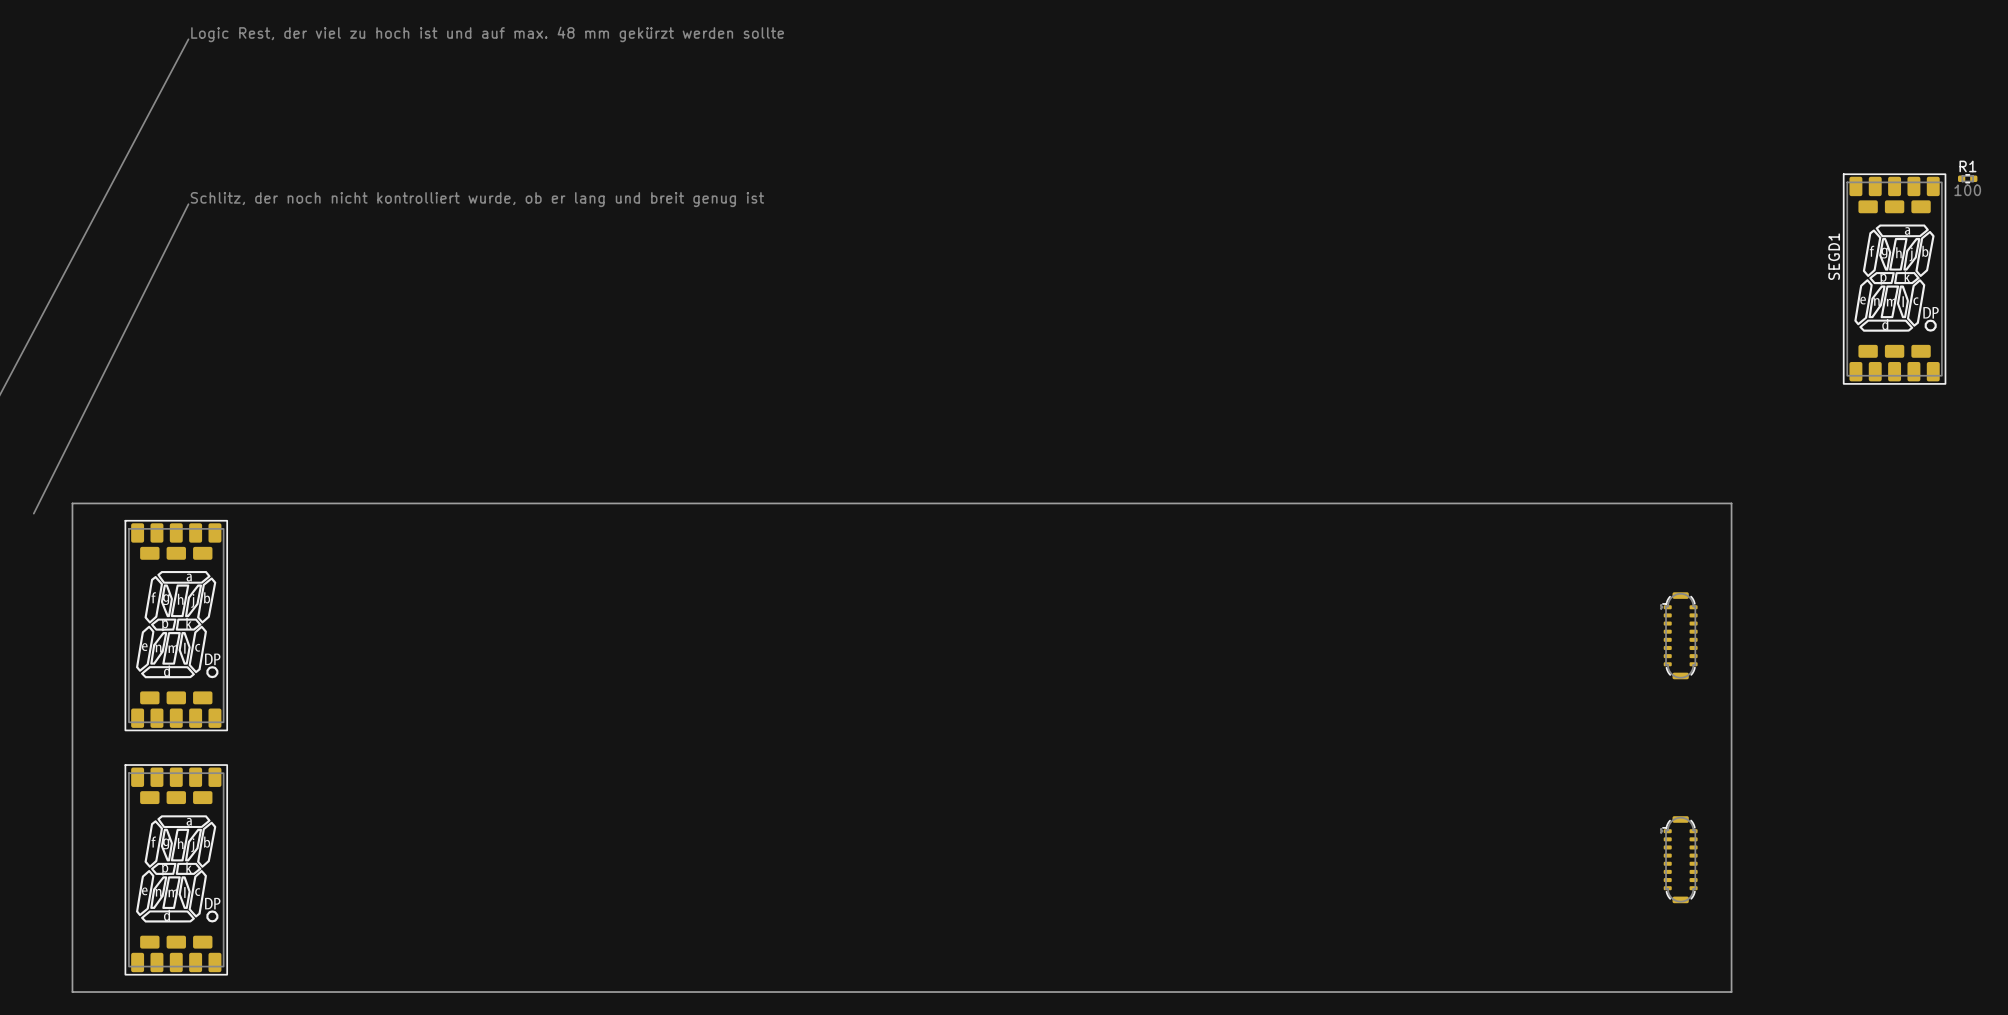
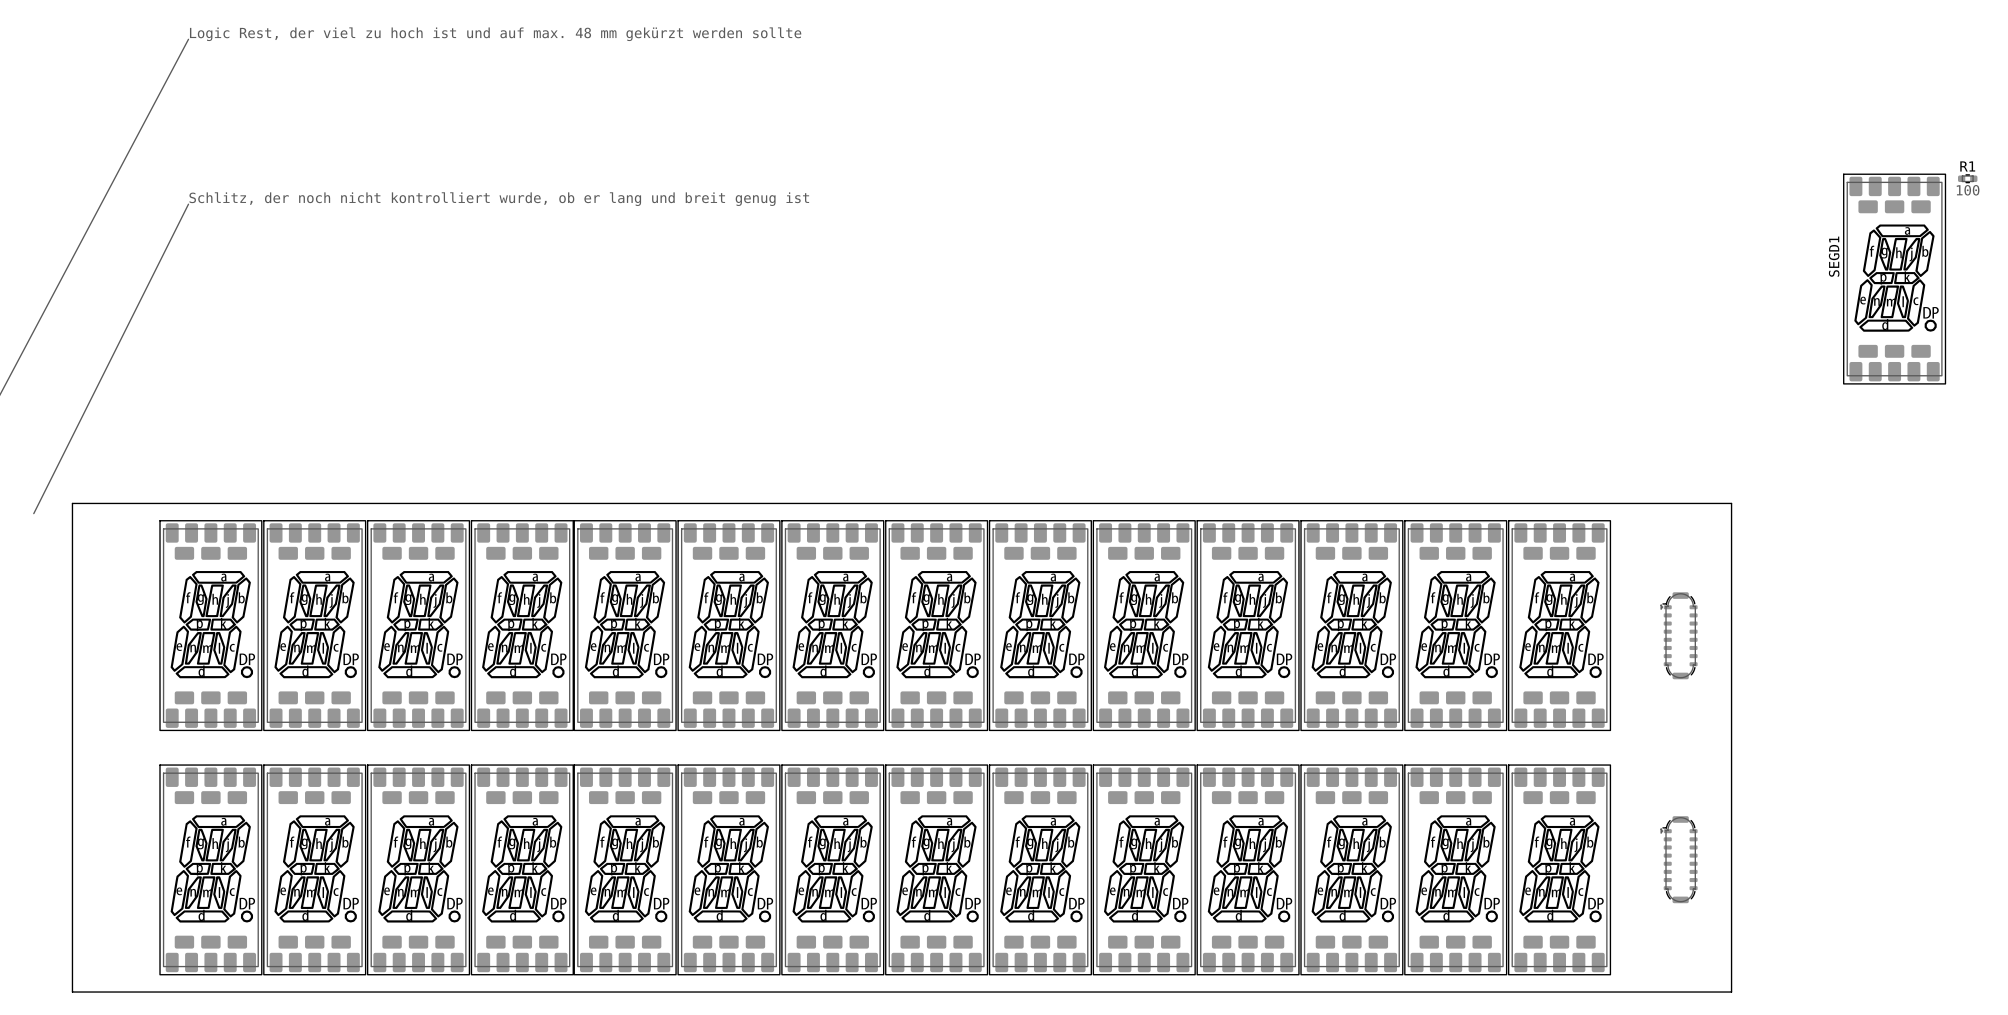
part position: (176, 625) -> (210, 625)
part: none -> (314, 625)
part: none -> (418, 625)
part: none -> (522, 625)
part: none -> (625, 625)
part: none -> (728, 625)
part: none -> (832, 625)
part: none -> (936, 625)
part: none -> (1040, 625)
part: none -> (1144, 625)
part: none -> (1248, 625)
part: none -> (1351, 625)
part: none -> (1455, 625)
part: none -> (1559, 625)
part position: (176, 869) -> (210, 869)
part: none -> (314, 869)
part: none -> (418, 869)
part: none -> (522, 869)
part: none -> (625, 869)
part: none -> (728, 869)
part: none -> (832, 869)
part: none -> (936, 869)
part: none -> (1040, 869)
part: none -> (1144, 869)
part: none -> (1248, 869)
part: none -> (1351, 869)
part: none -> (1455, 869)
part: none -> (1559, 869)

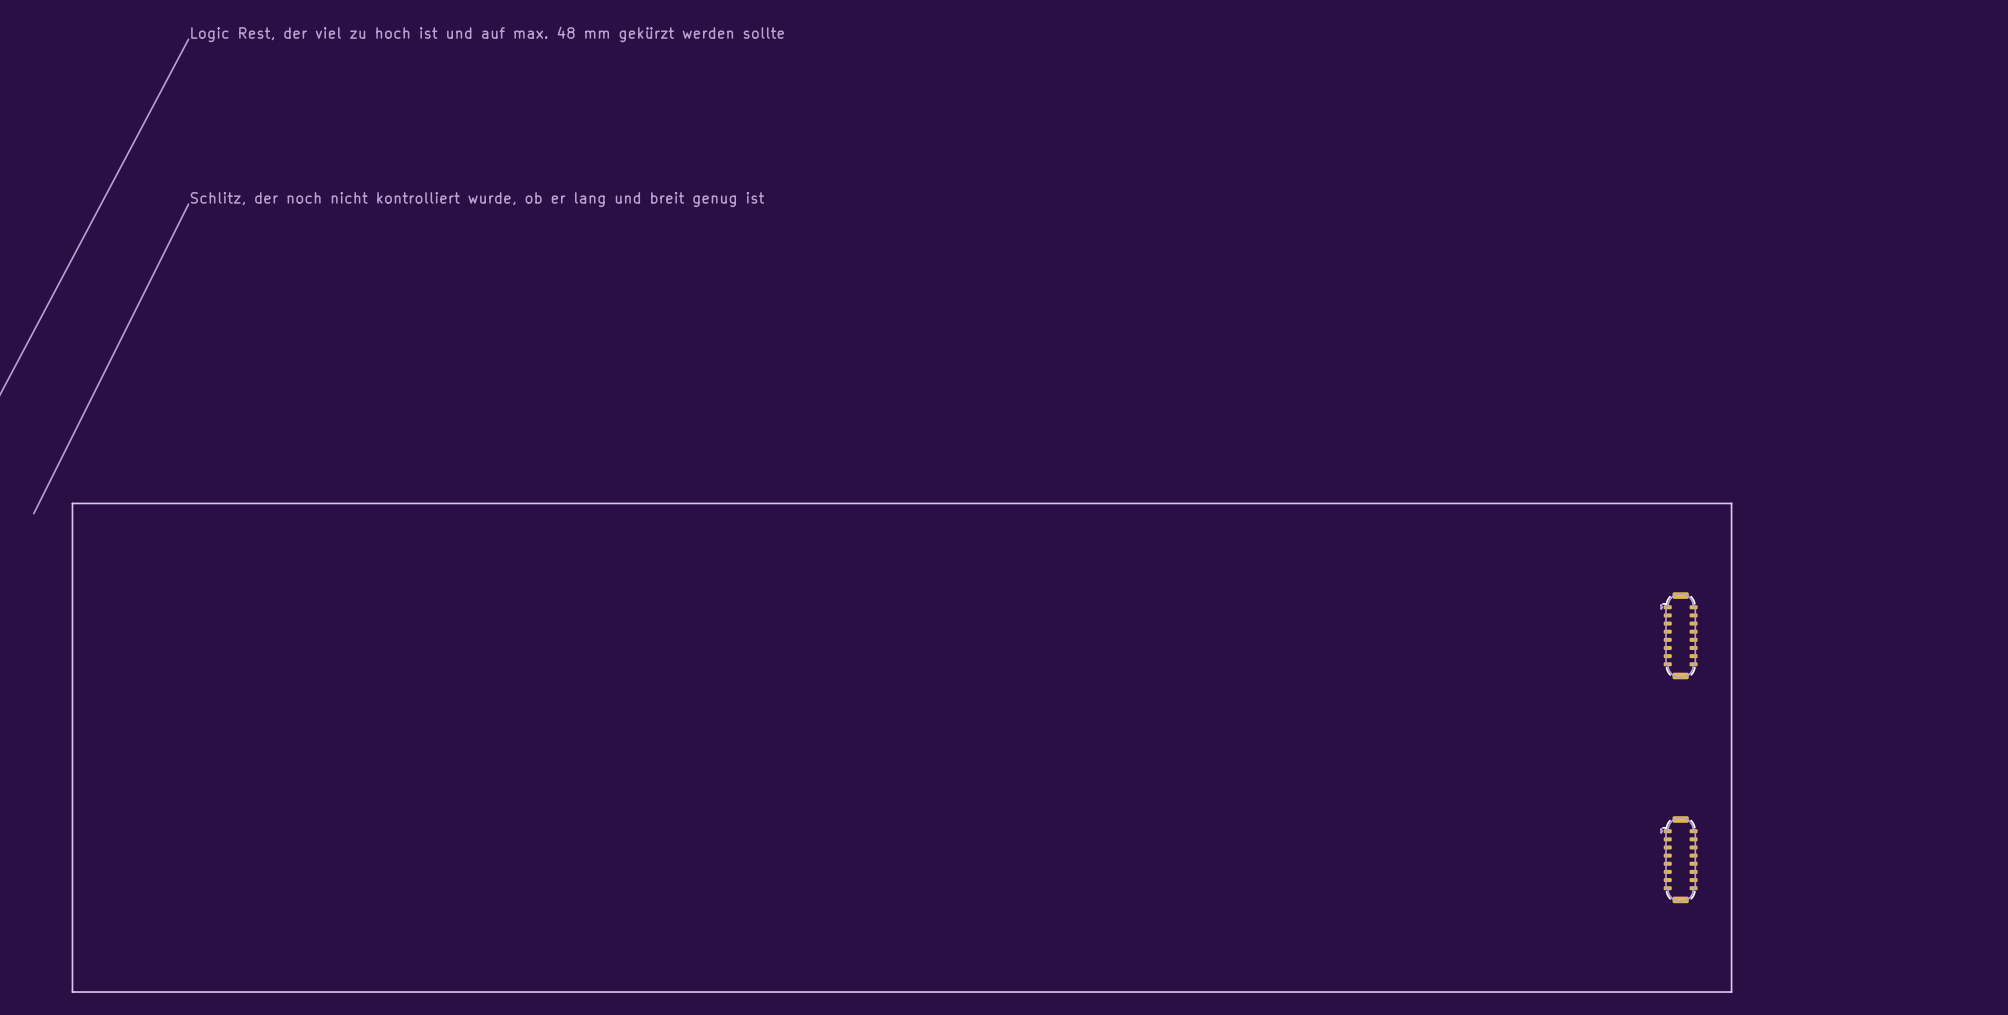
R1: 100 (1967, 178) -> none
SEGD1: (1894, 279) -> none
part: (210, 625) -> none
part: (314, 625) -> none
part: (418, 625) -> none
part: (522, 625) -> none
part: (625, 625) -> none
part: (728, 625) -> none
part: (832, 625) -> none
part: (936, 625) -> none
part: (1040, 625) -> none
part: (1144, 625) -> none
part: (1248, 625) -> none
part: (1351, 625) -> none
part: (1455, 625) -> none
part: (1559, 625) -> none
part: (210, 869) -> none
part: (314, 869) -> none
part: (418, 869) -> none
part: (522, 869) -> none
part: (625, 869) -> none
part: (728, 869) -> none
part: (832, 869) -> none
part: (936, 869) -> none
part: (1040, 869) -> none
part: (1144, 869) -> none
part: (1248, 869) -> none
part: (1351, 869) -> none
part: (1455, 869) -> none
part: (1559, 869) -> none

